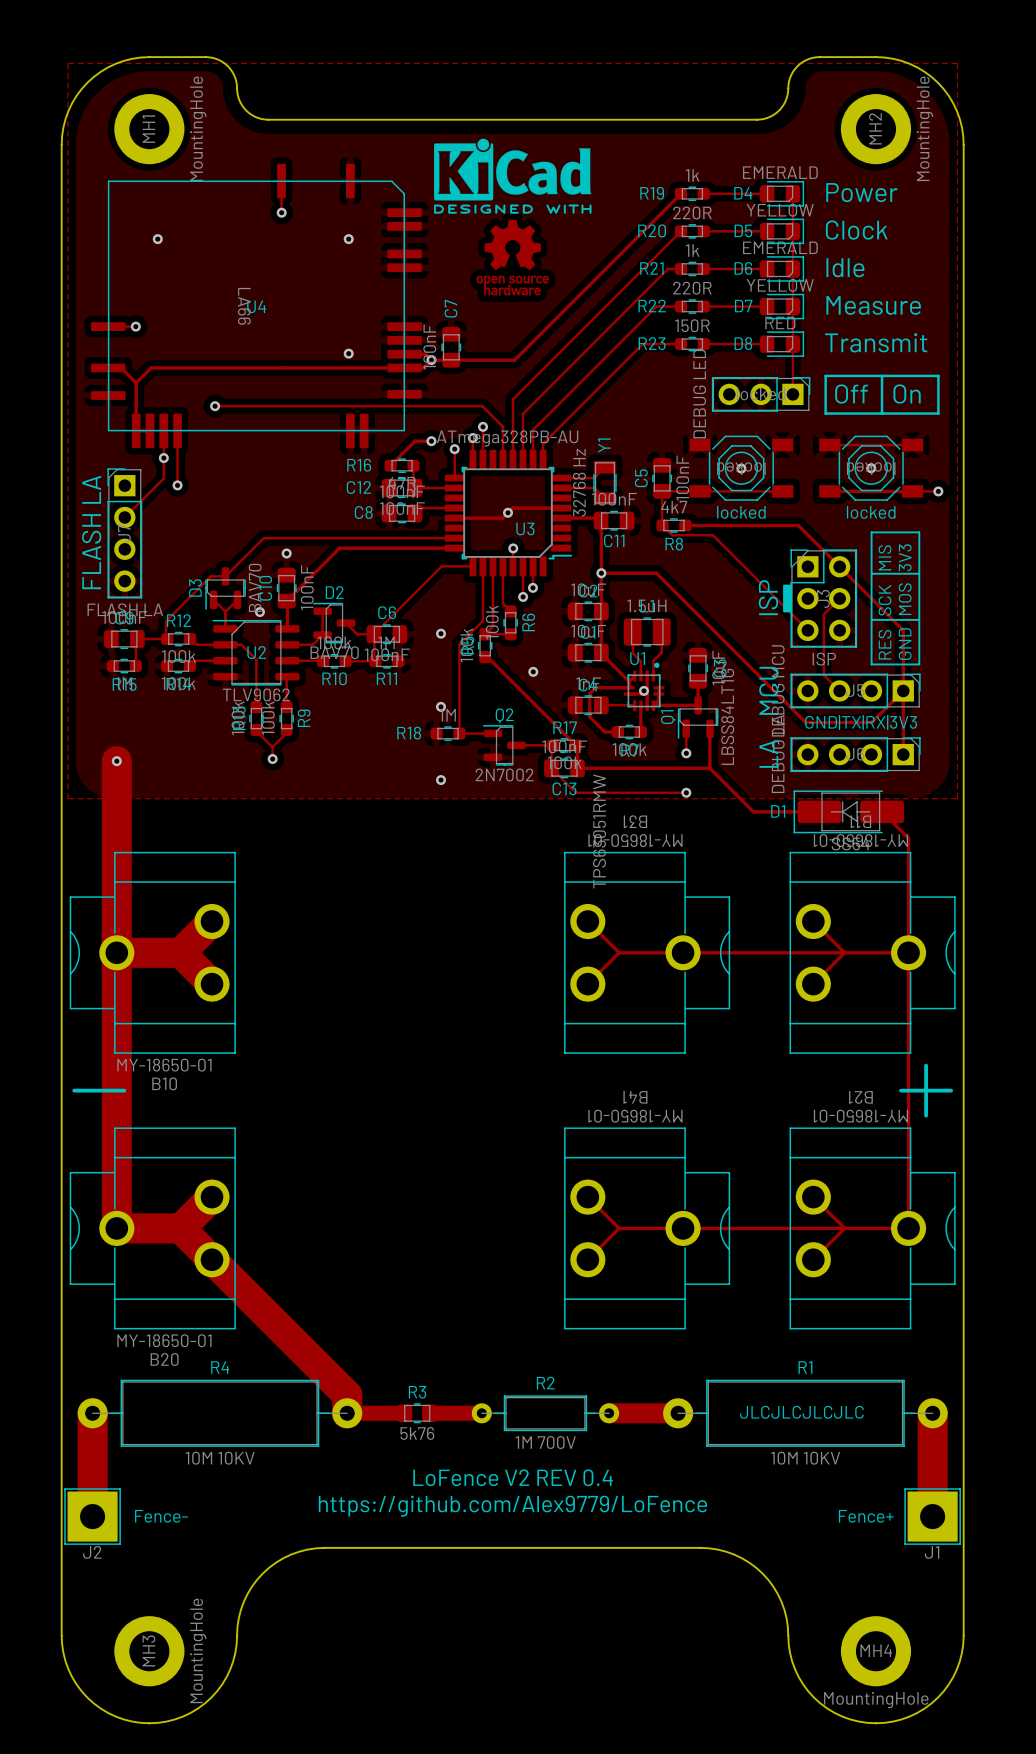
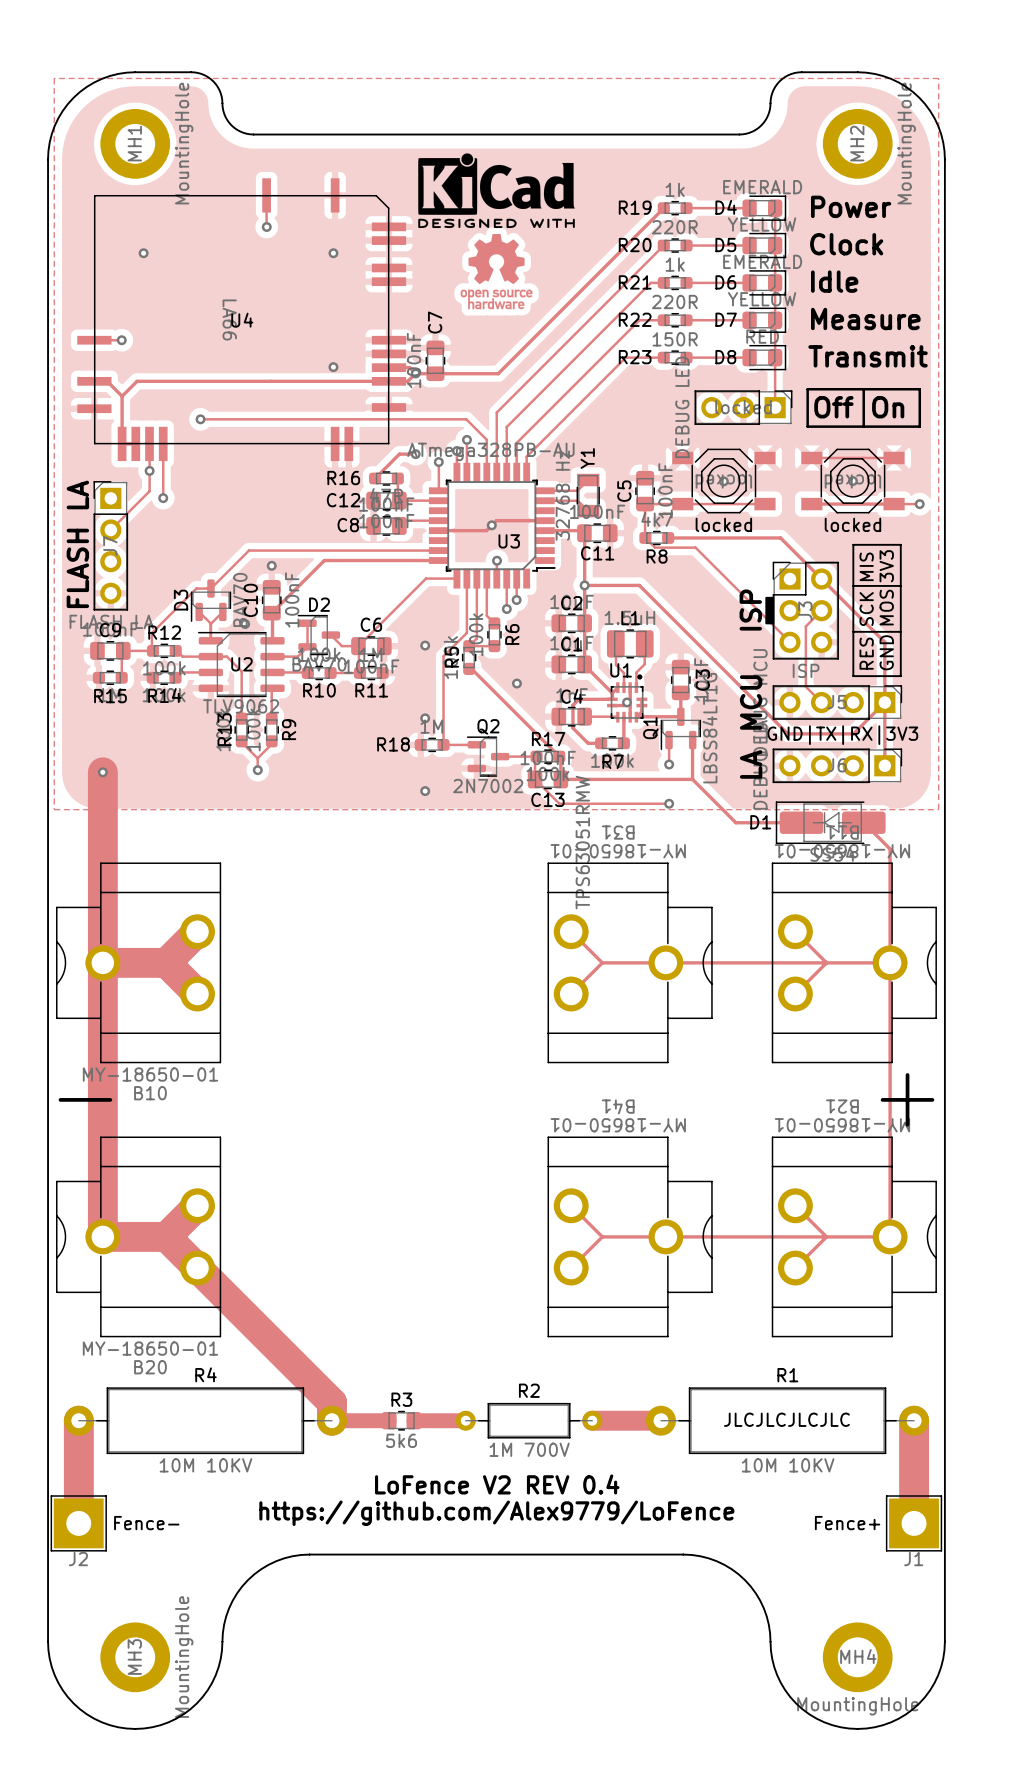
R3 value: 5k76 (417, 1433) -> 5k6 (401, 1440)

